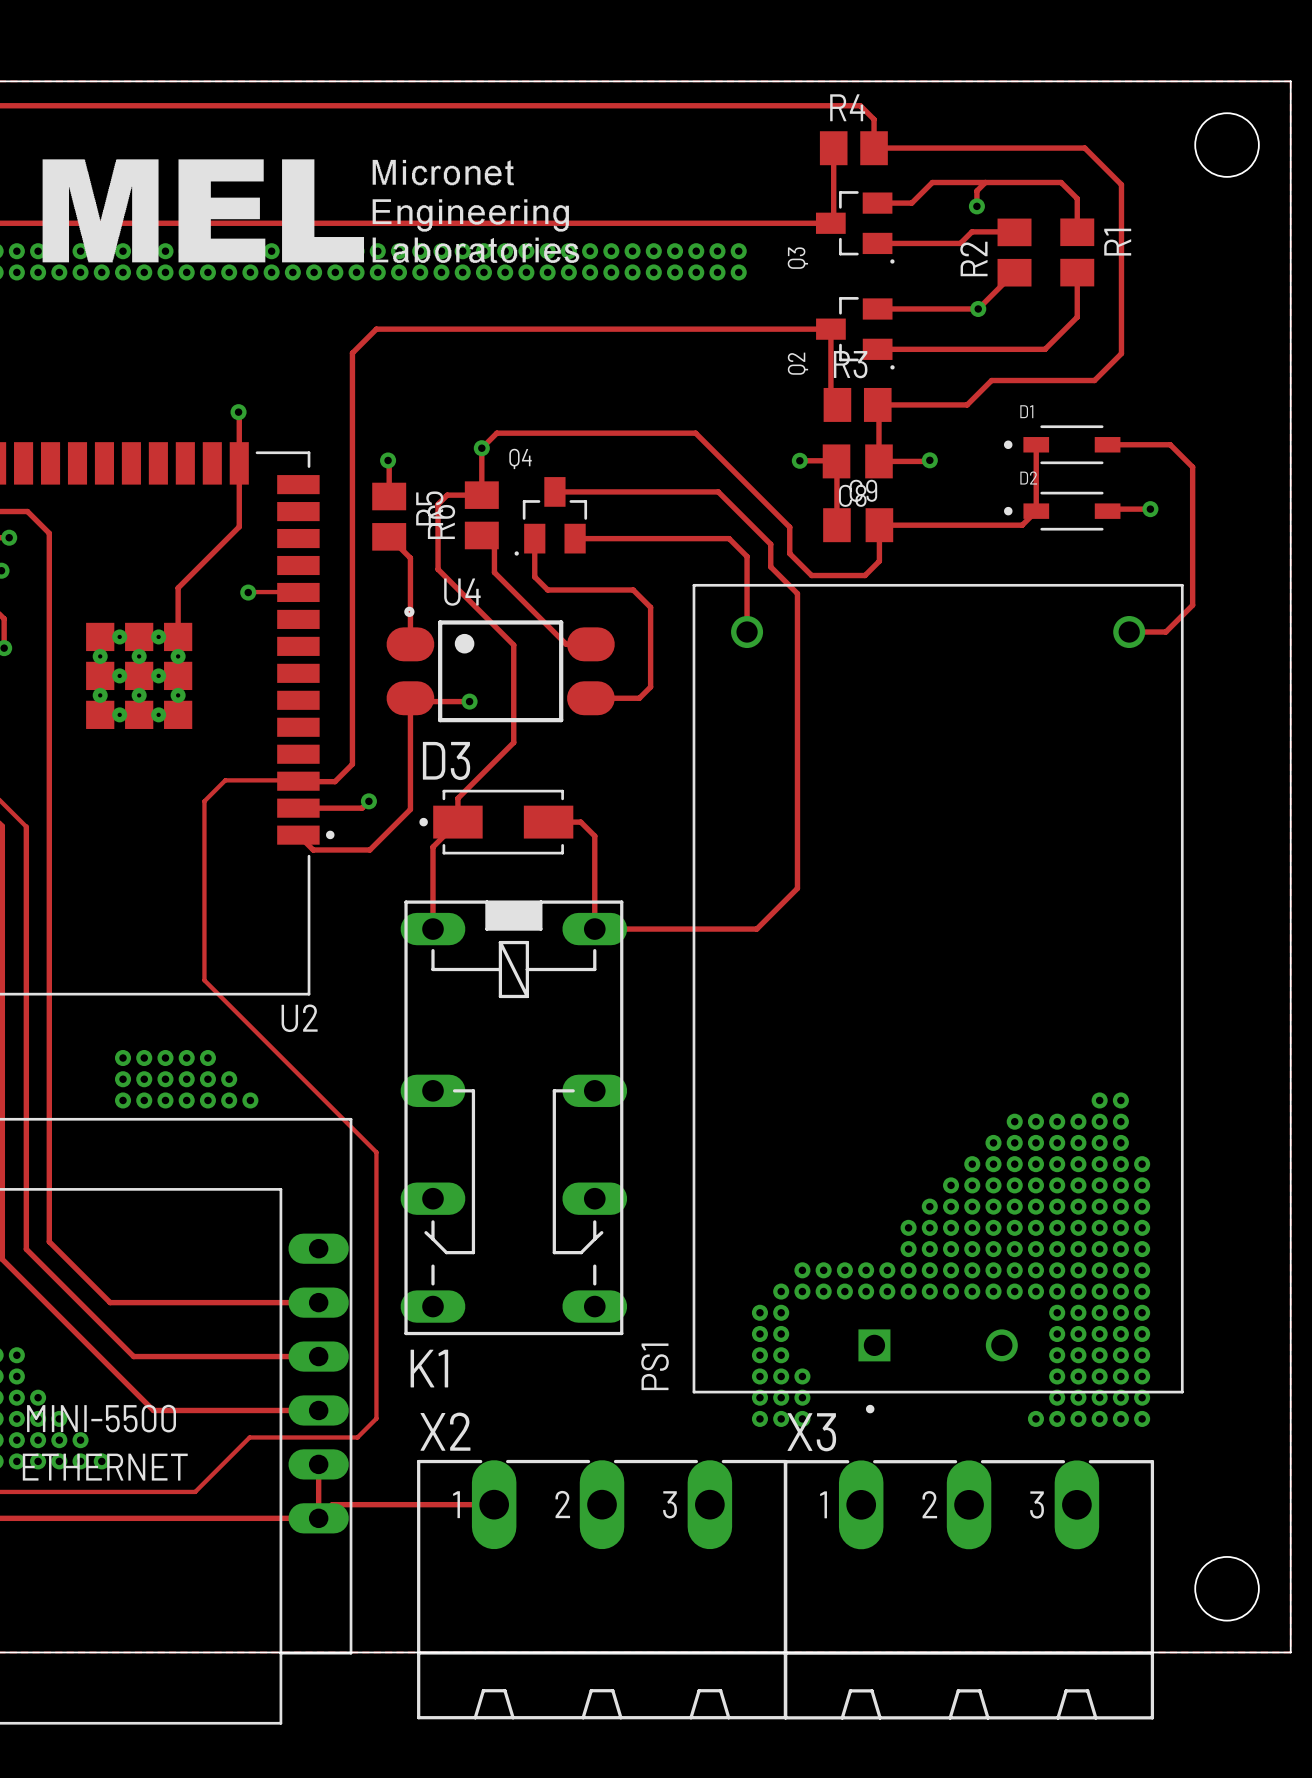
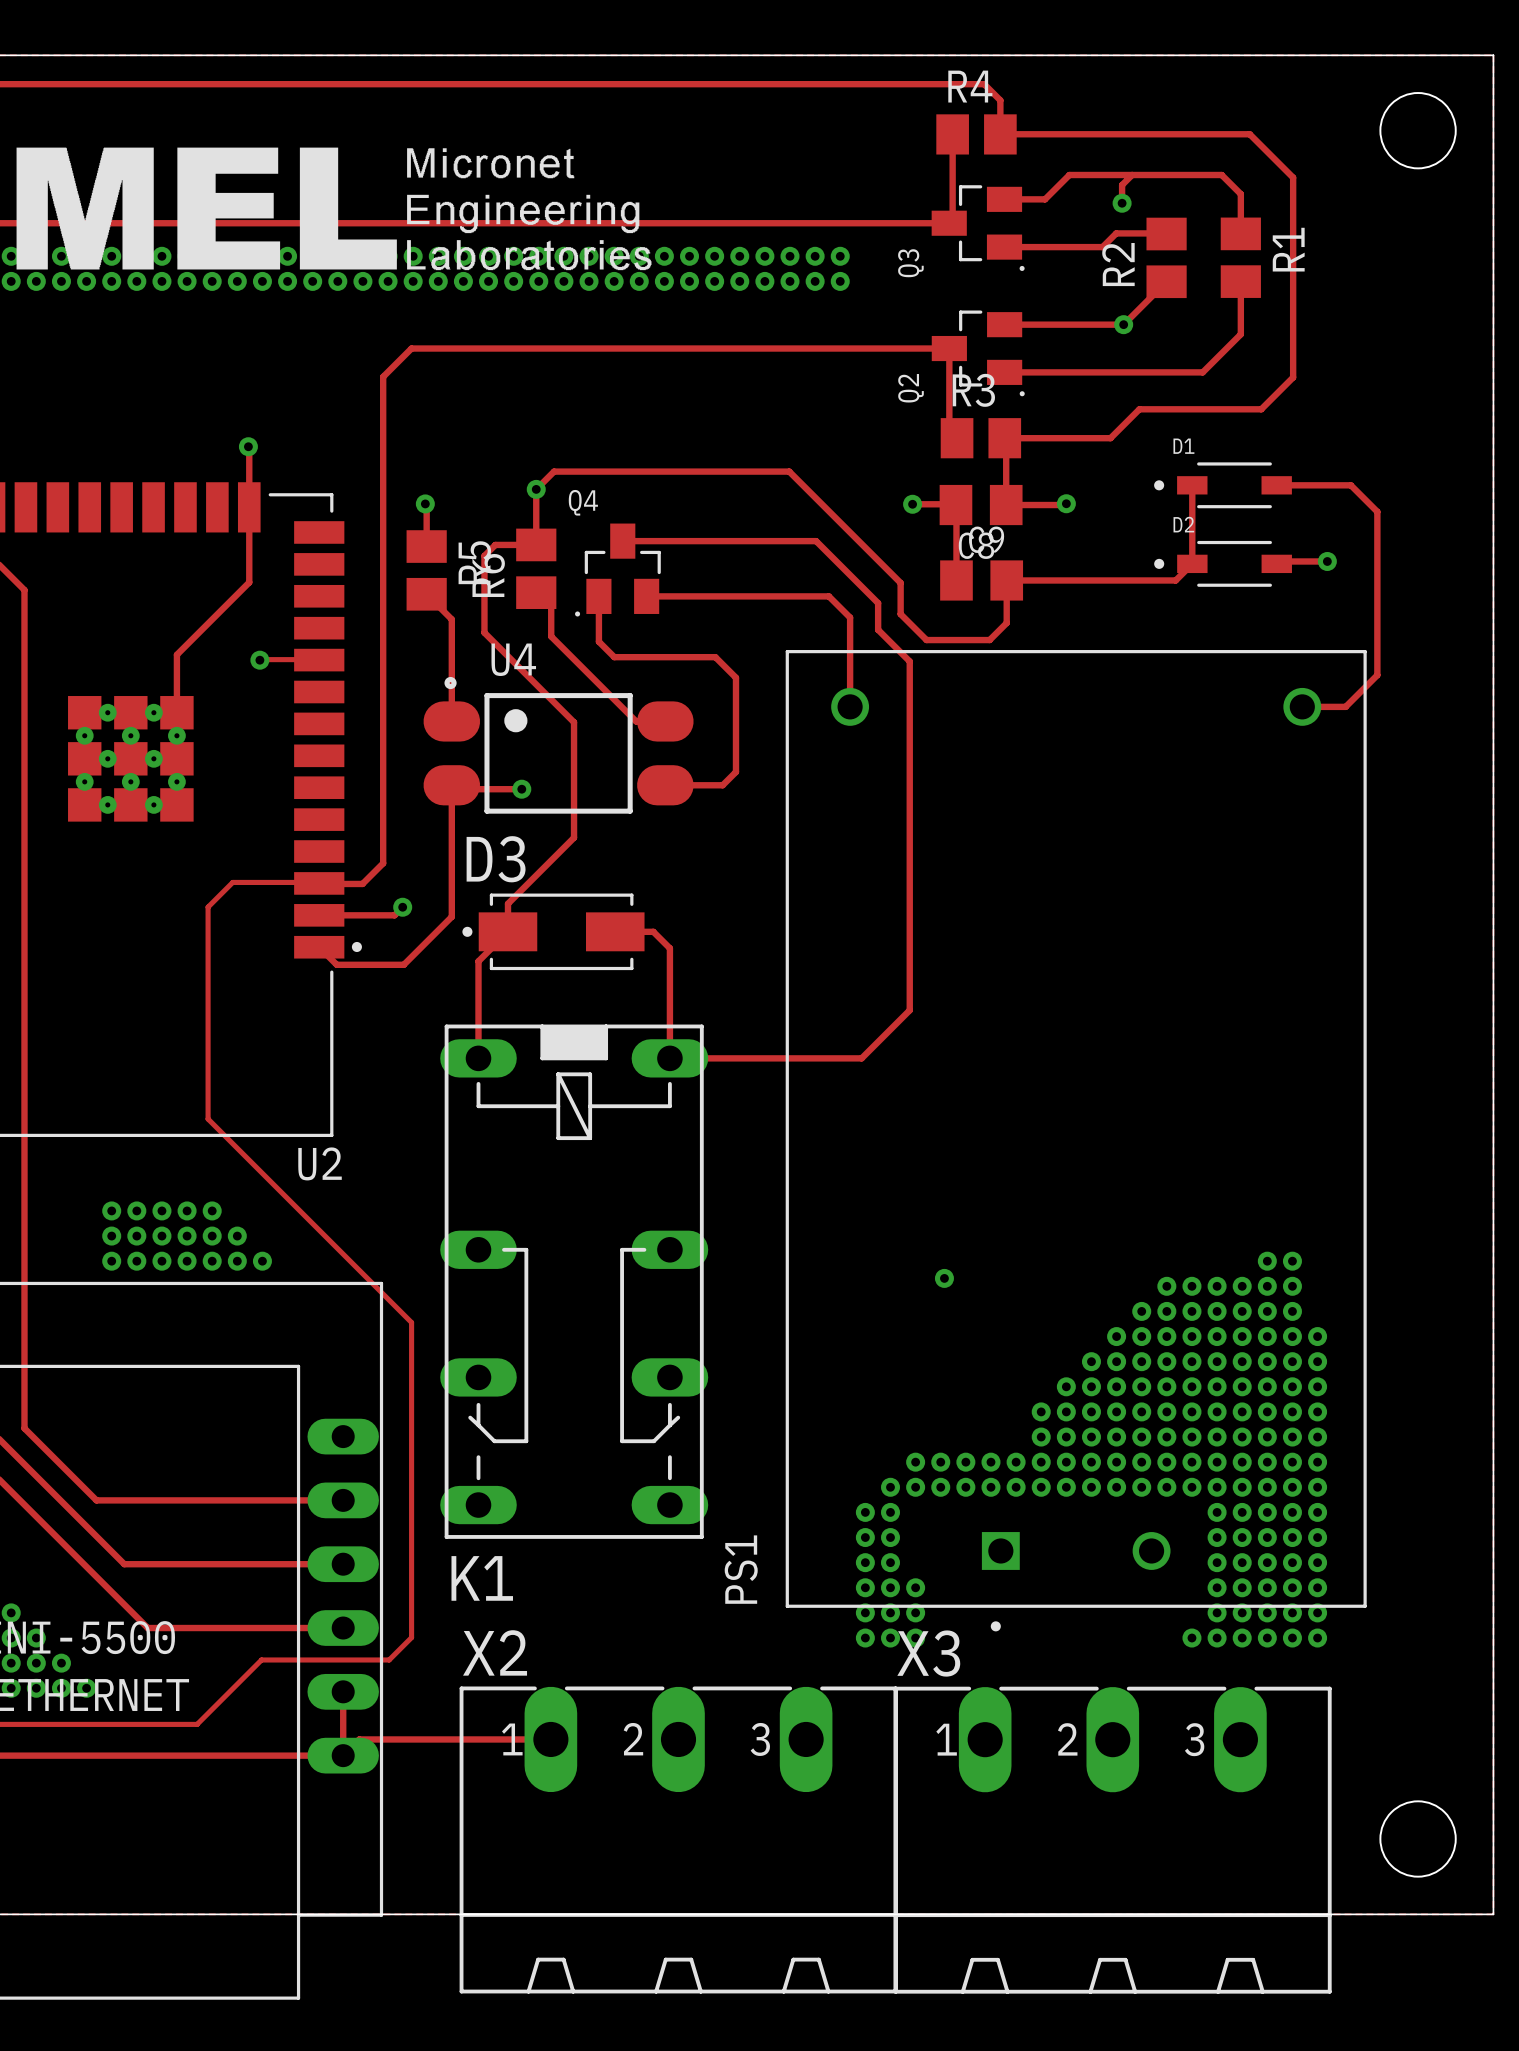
via: none -> (944, 1278)

